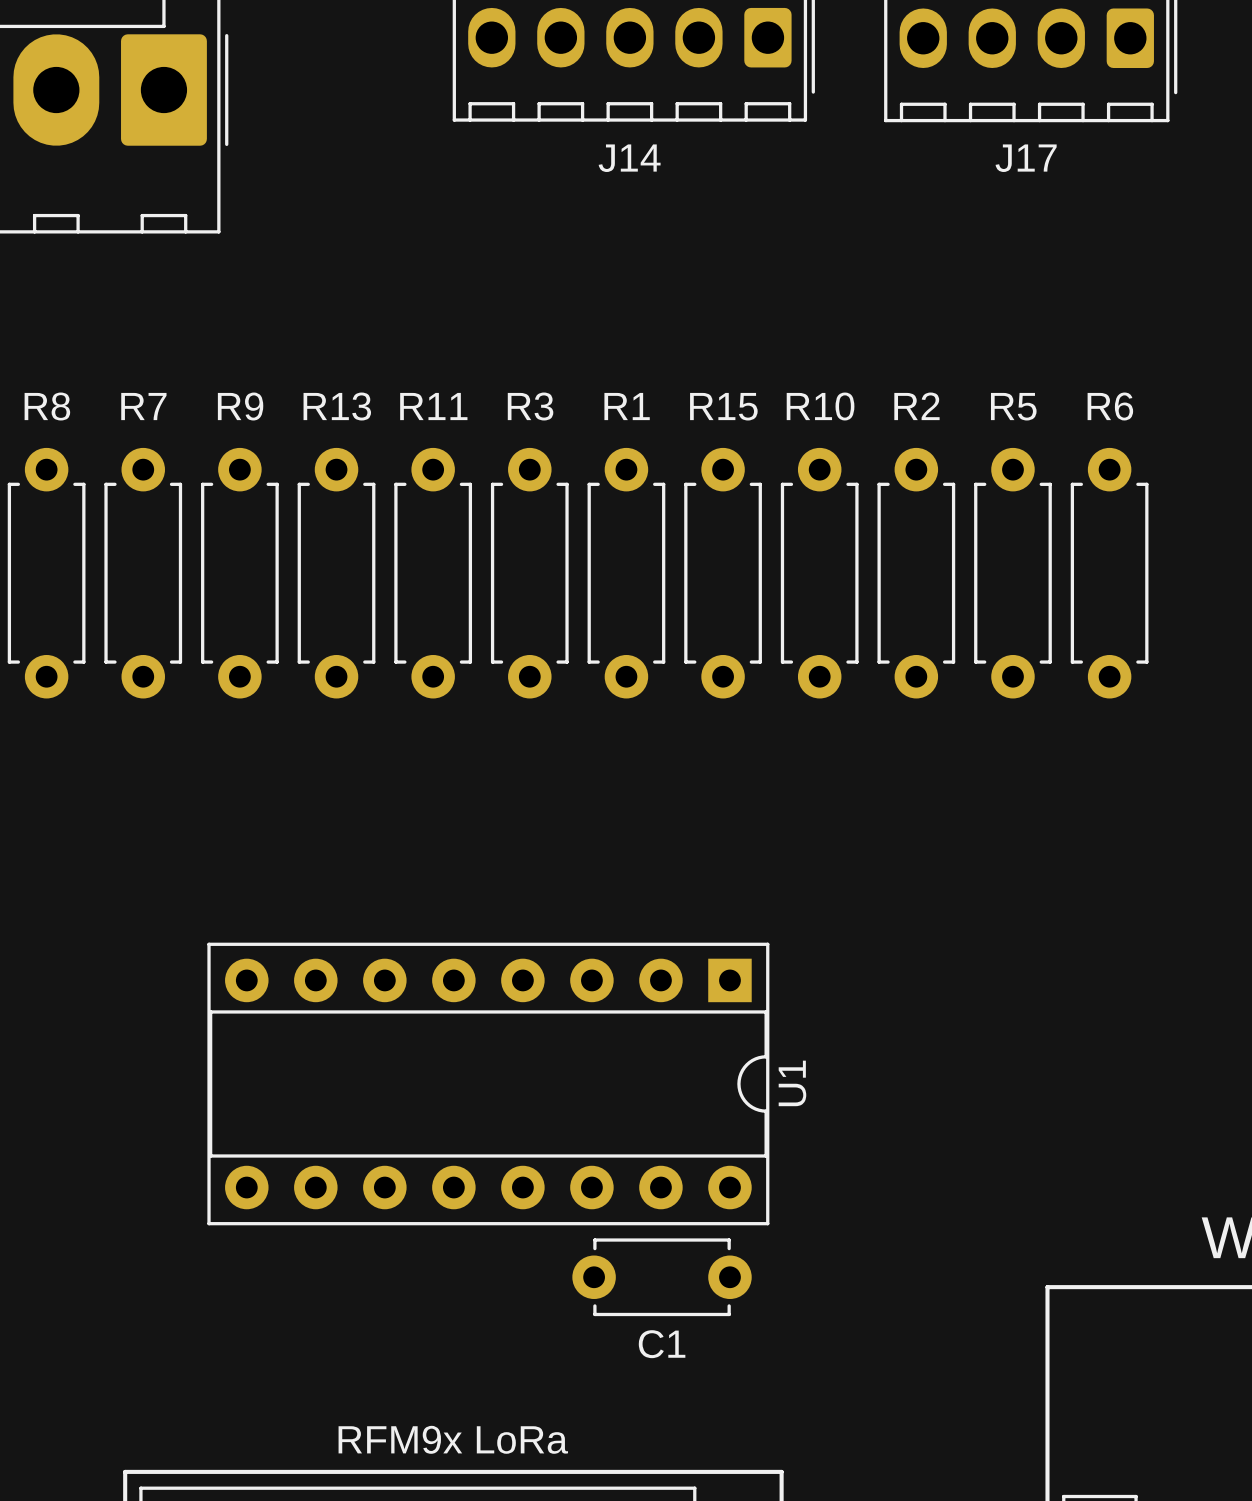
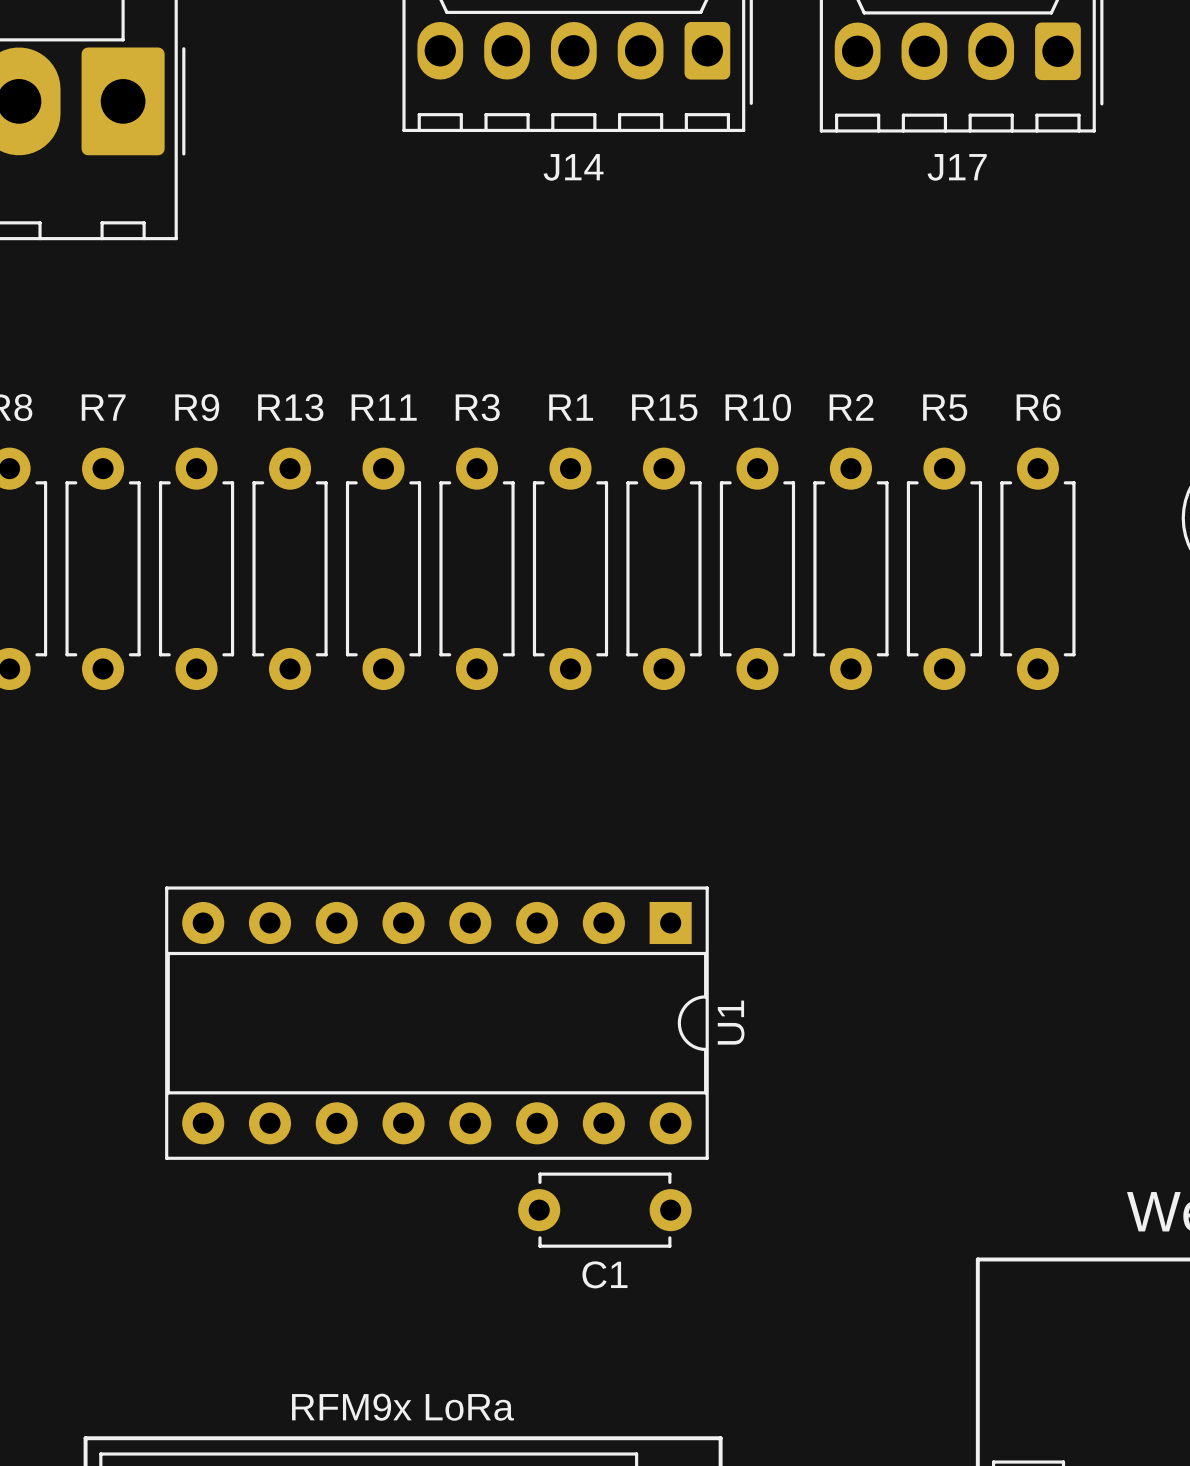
U1 position: (488, 1083) -> (436, 1023)
C1 position: (662, 1277) -> (604, 1210)

